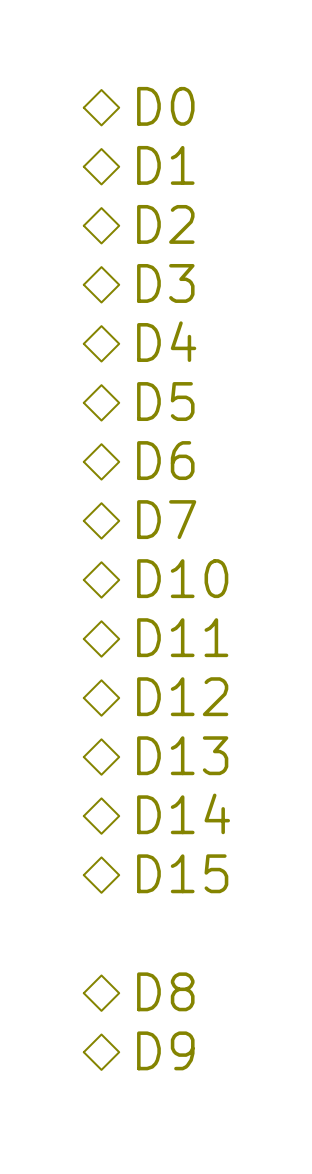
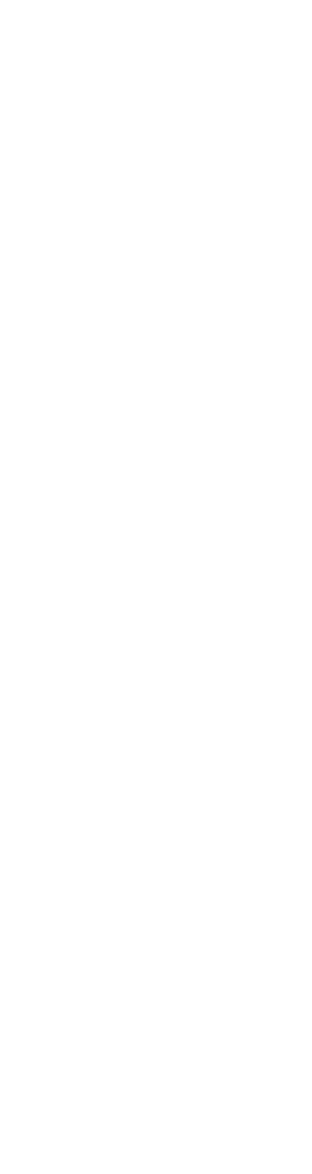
hierarchical label: D0 (165, 106) -> none
hierarchical label: D1 (165, 165) -> none
hierarchical label: D2 (165, 224) -> none
hierarchical label: D3 (165, 283) -> none
hierarchical label: D4 (166, 341) -> none
hierarchical label: D5 (165, 401) -> none
hierarchical label: D6 (165, 460) -> none
hierarchical label: D7 (166, 519) -> none
hierarchical label: D10 (182, 578) -> none
hierarchical label: D11 (182, 637) -> none
hierarchical label: D12 (182, 696) -> none
hierarchical label: D13 (182, 755) -> none
hierarchical label: D14 (183, 813) -> none
hierarchical label: D15 (182, 873) -> none
hierarchical label: D8 (165, 991) -> none
hierarchical label: D9 (165, 1050) -> none

